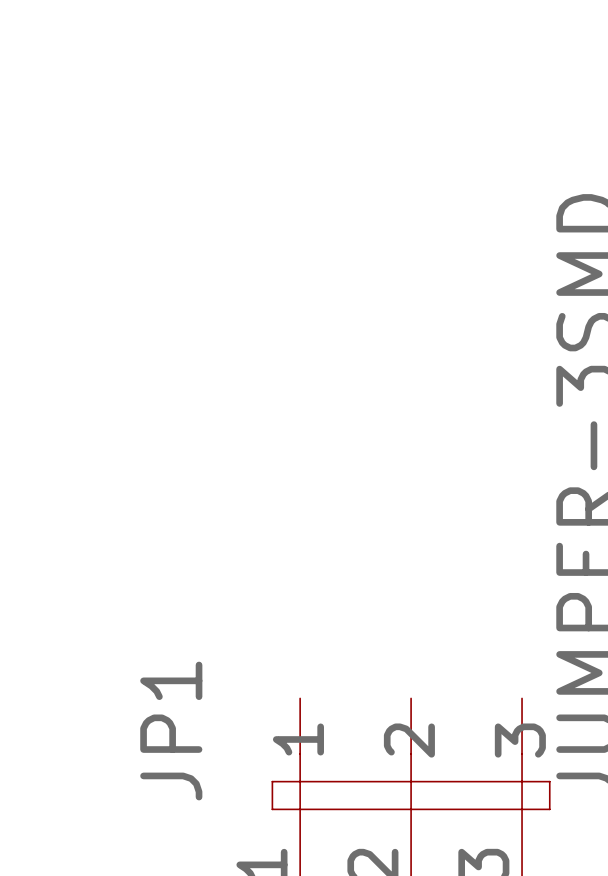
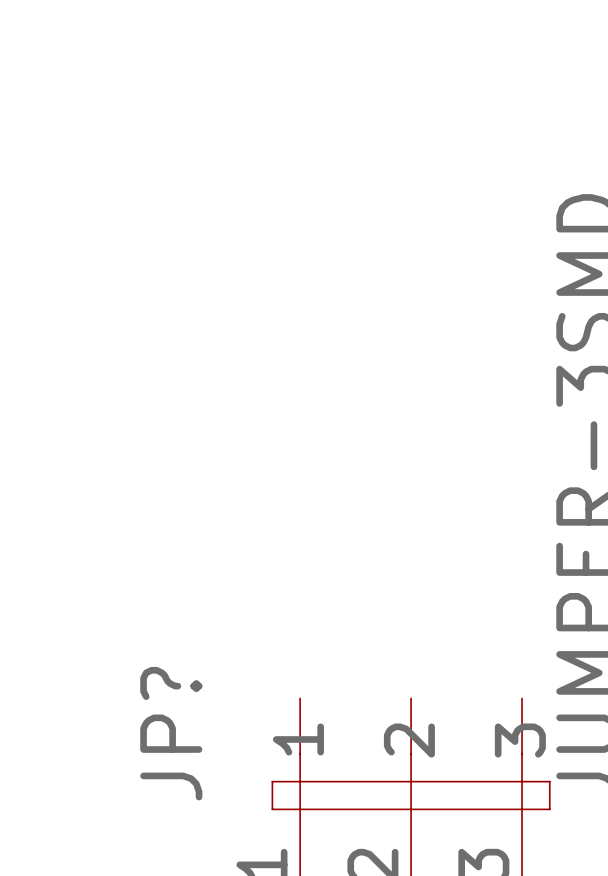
JP1 name: JP1 (171, 731) -> JP? (171, 733)

